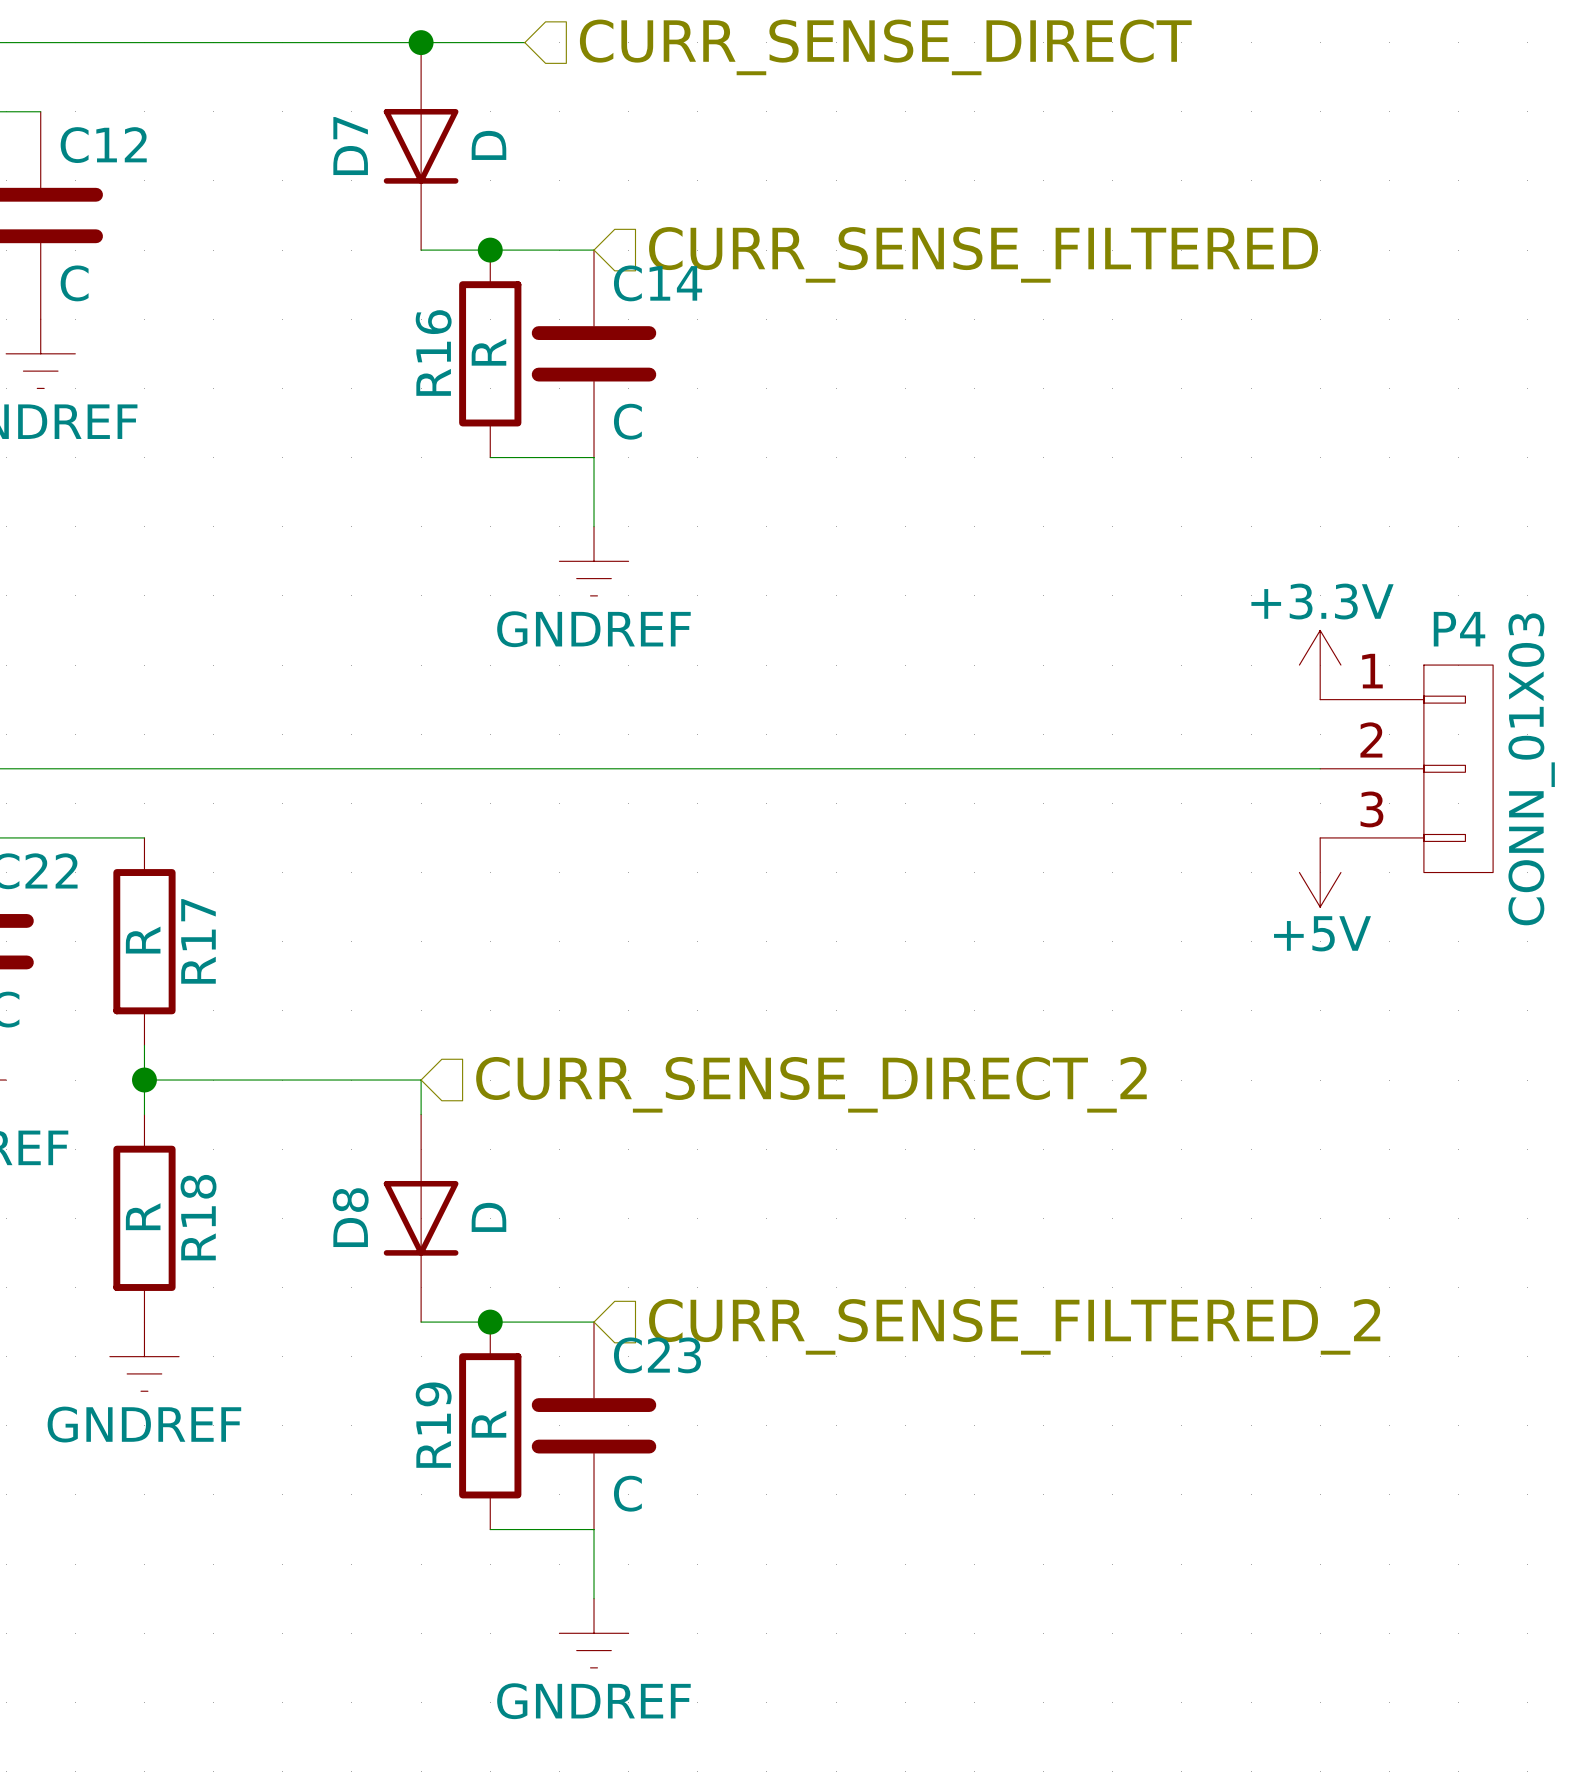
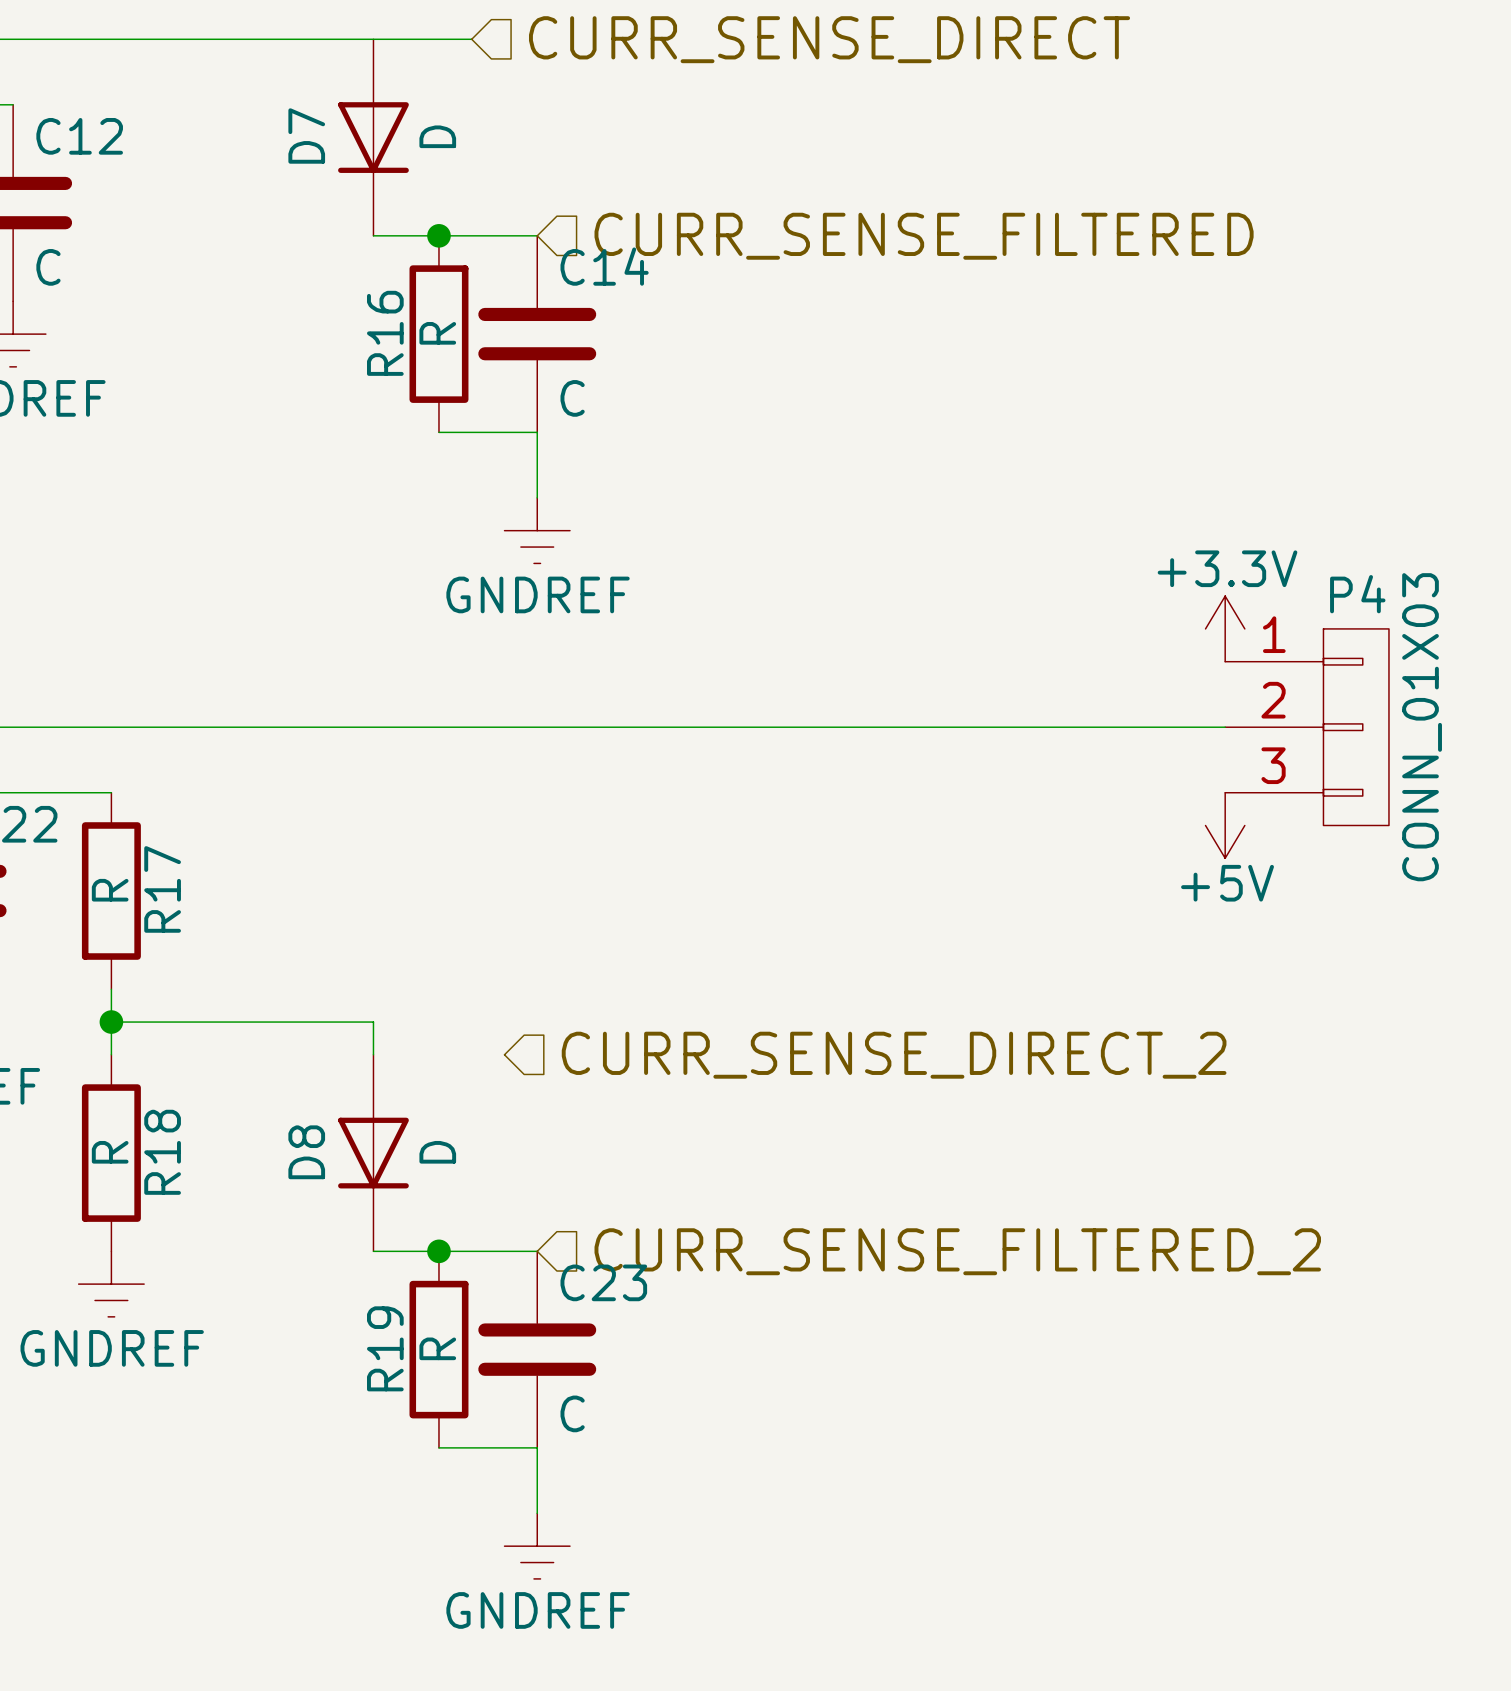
junction: (421, 42) -> none
hierarchical label position: CURR_SENSE_DIRECT_2 (811, 1084) -> CURR_SENSE_DIRECT_2 (894, 1055)

